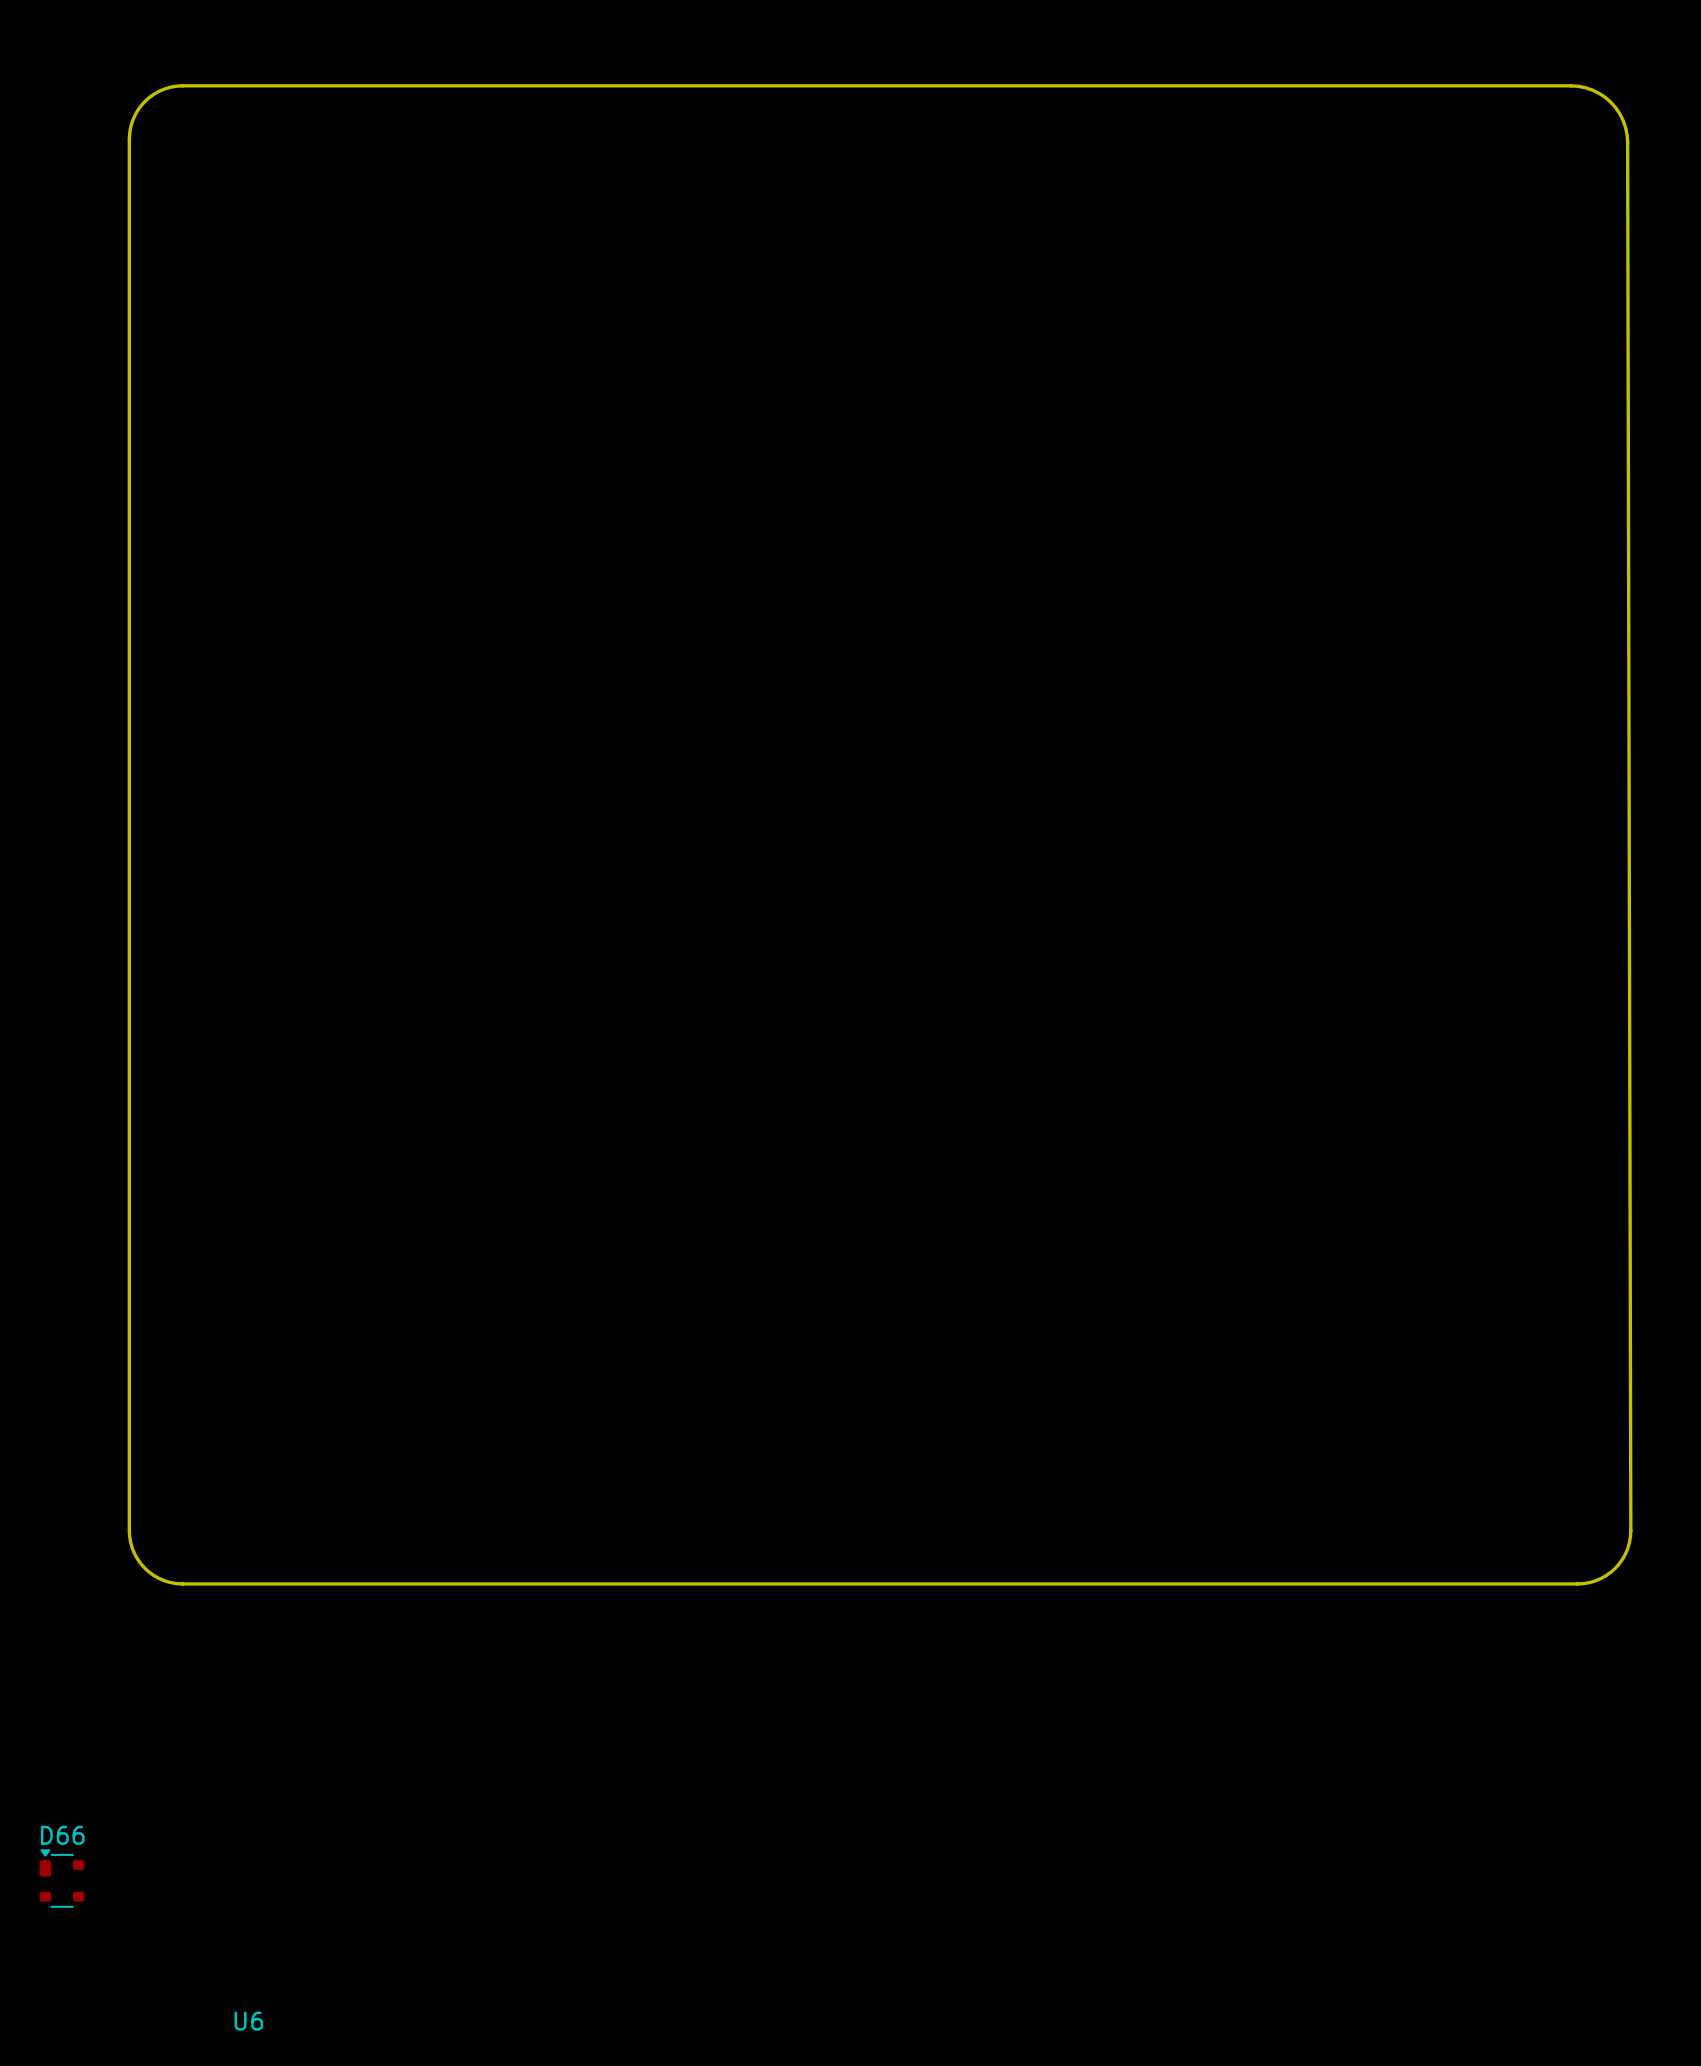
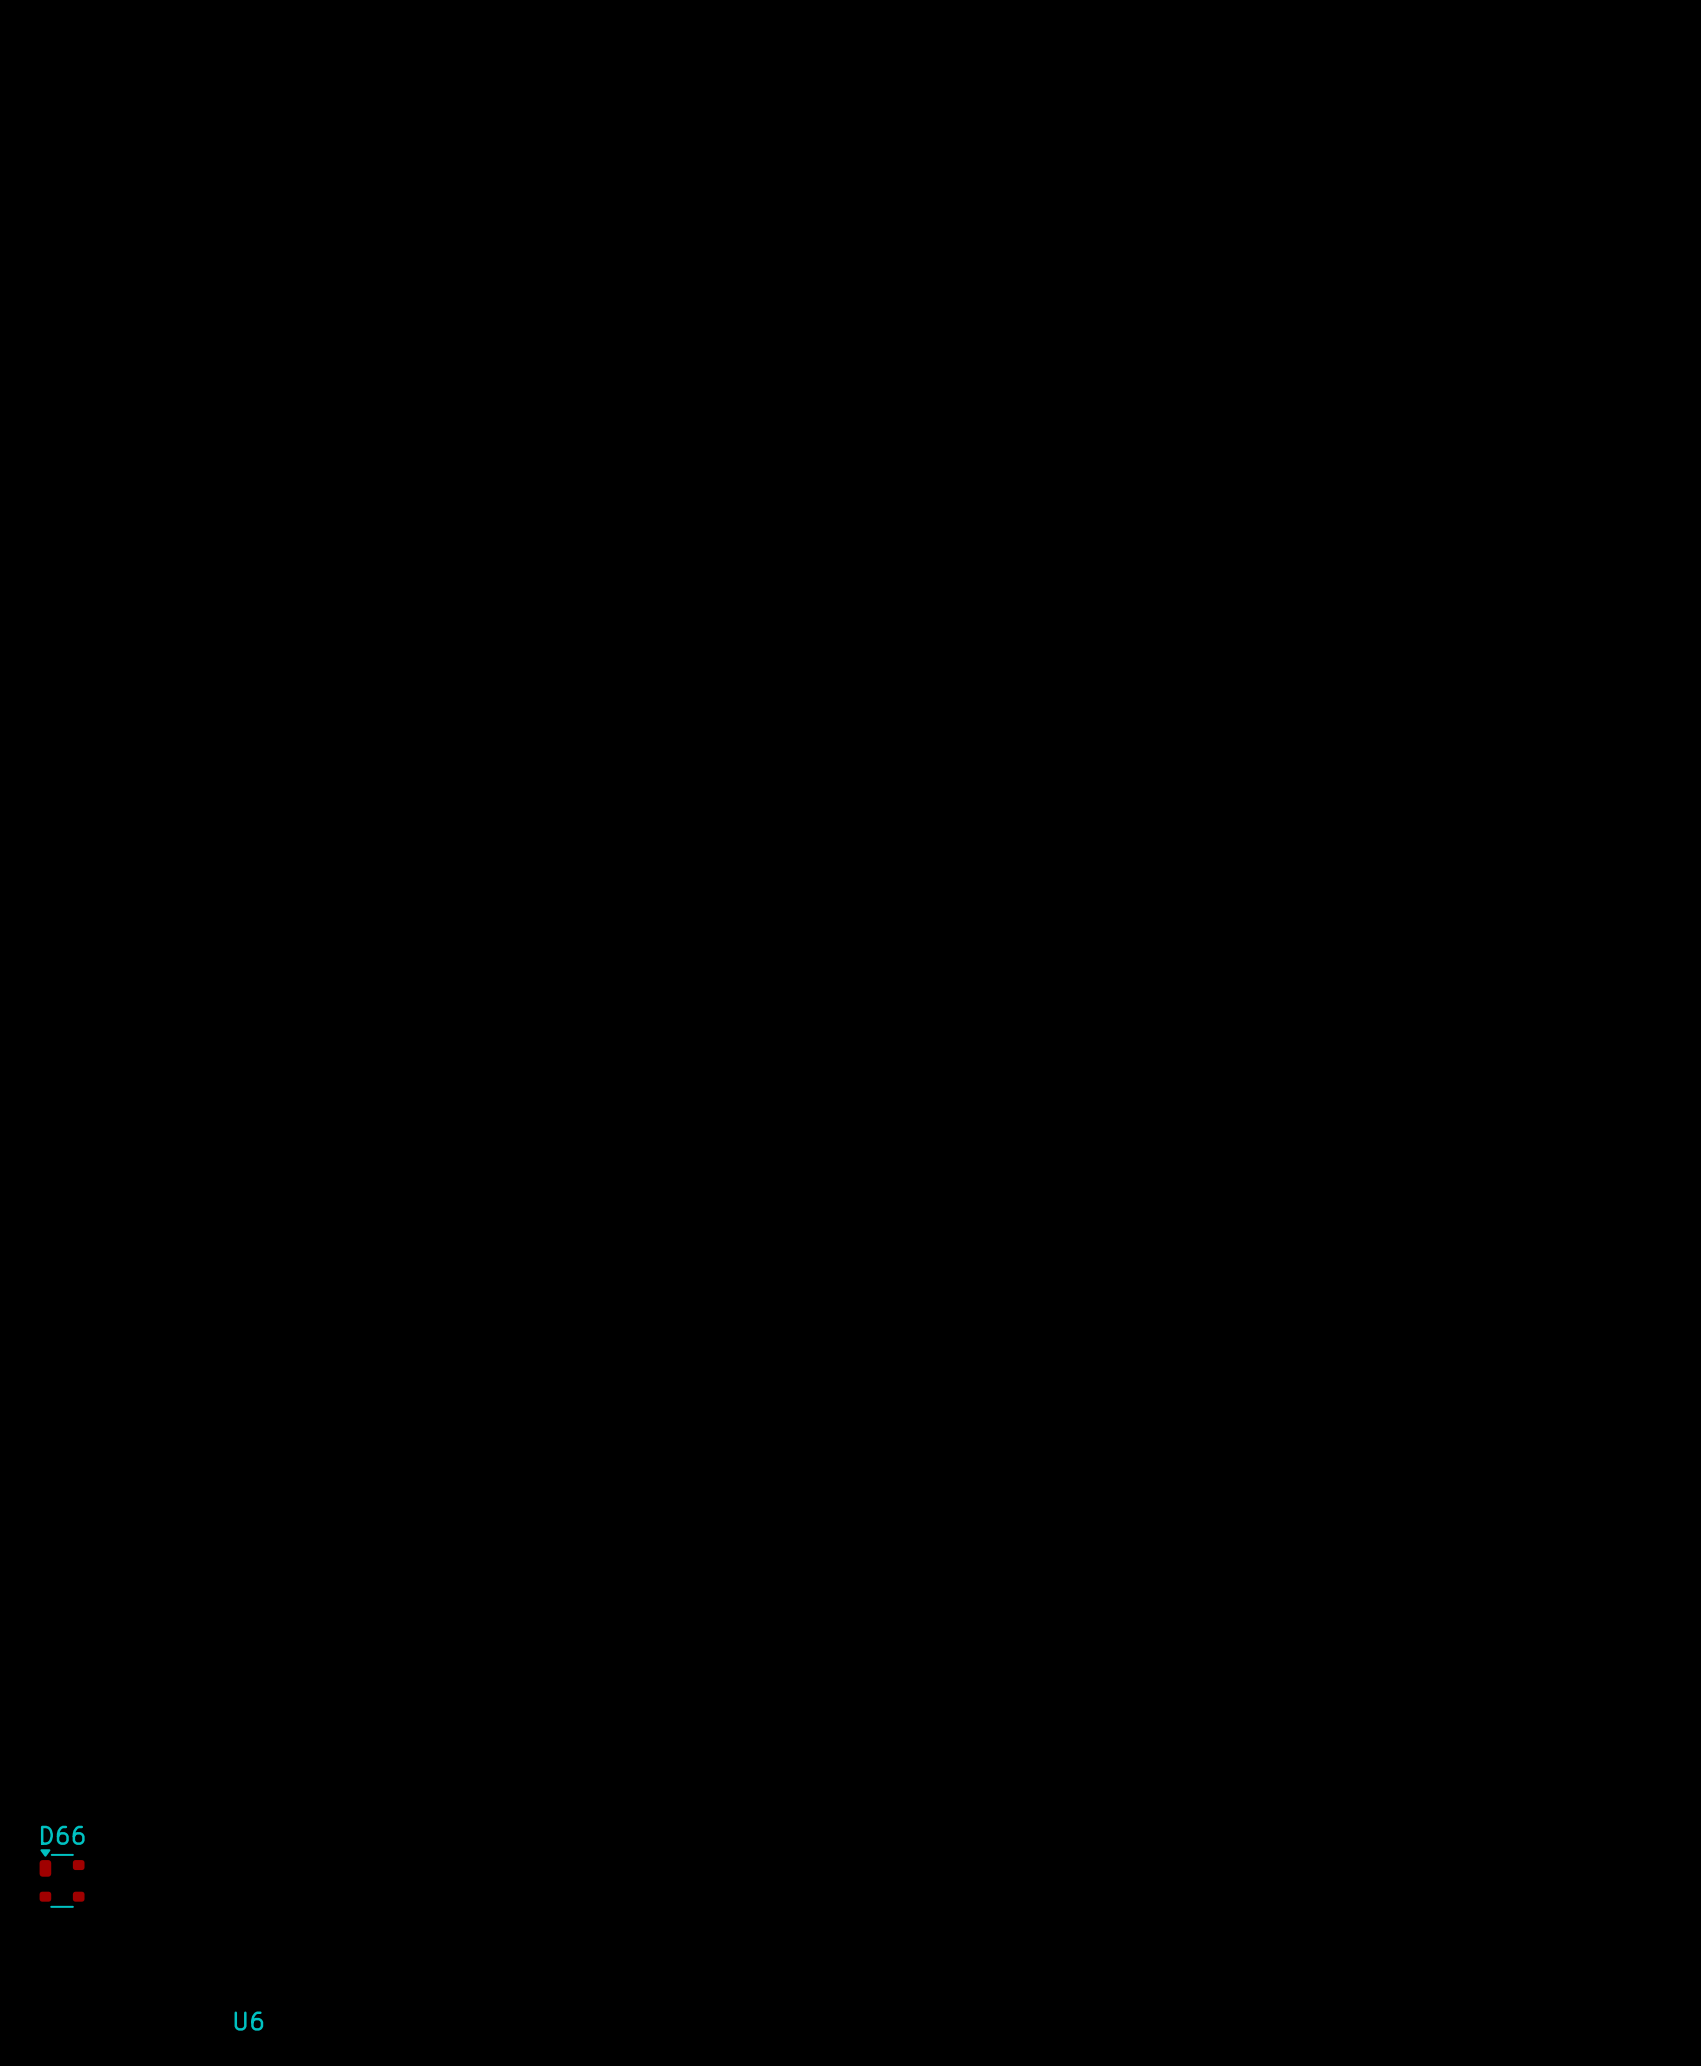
board edge: (182, 85) (1570, 85) (1592, 90) (1611, 102) (1623, 120) (1627, 142) (1630, 1530) (1625, 1553) (1615, 1568) (1595, 1580) (1577, 1583) (182, 1583) (159, 1578) (144, 1568) (134, 1553) (129, 1530) (129, 139) (134, 115) (144, 101) (165, 88) (176, 86) (182, 85) -> none

